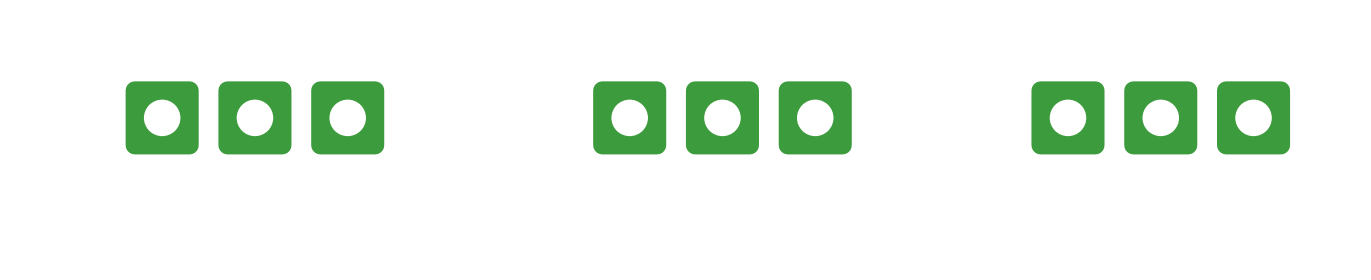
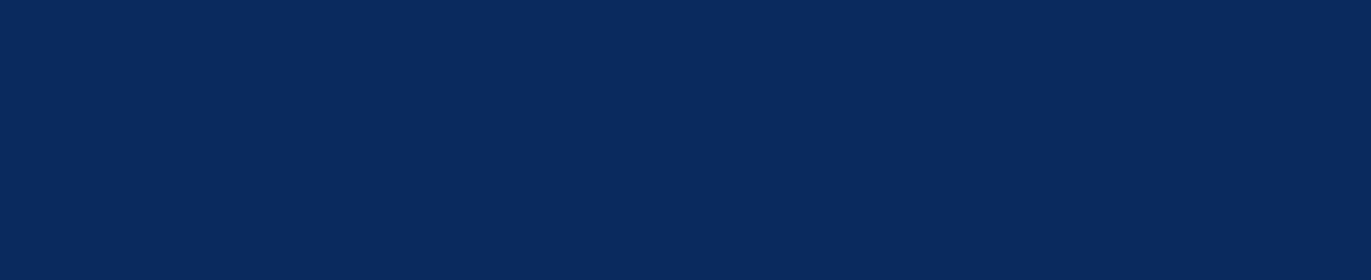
part: (254, 117) -> none
part: (722, 117) -> none
part: (1160, 117) -> none

